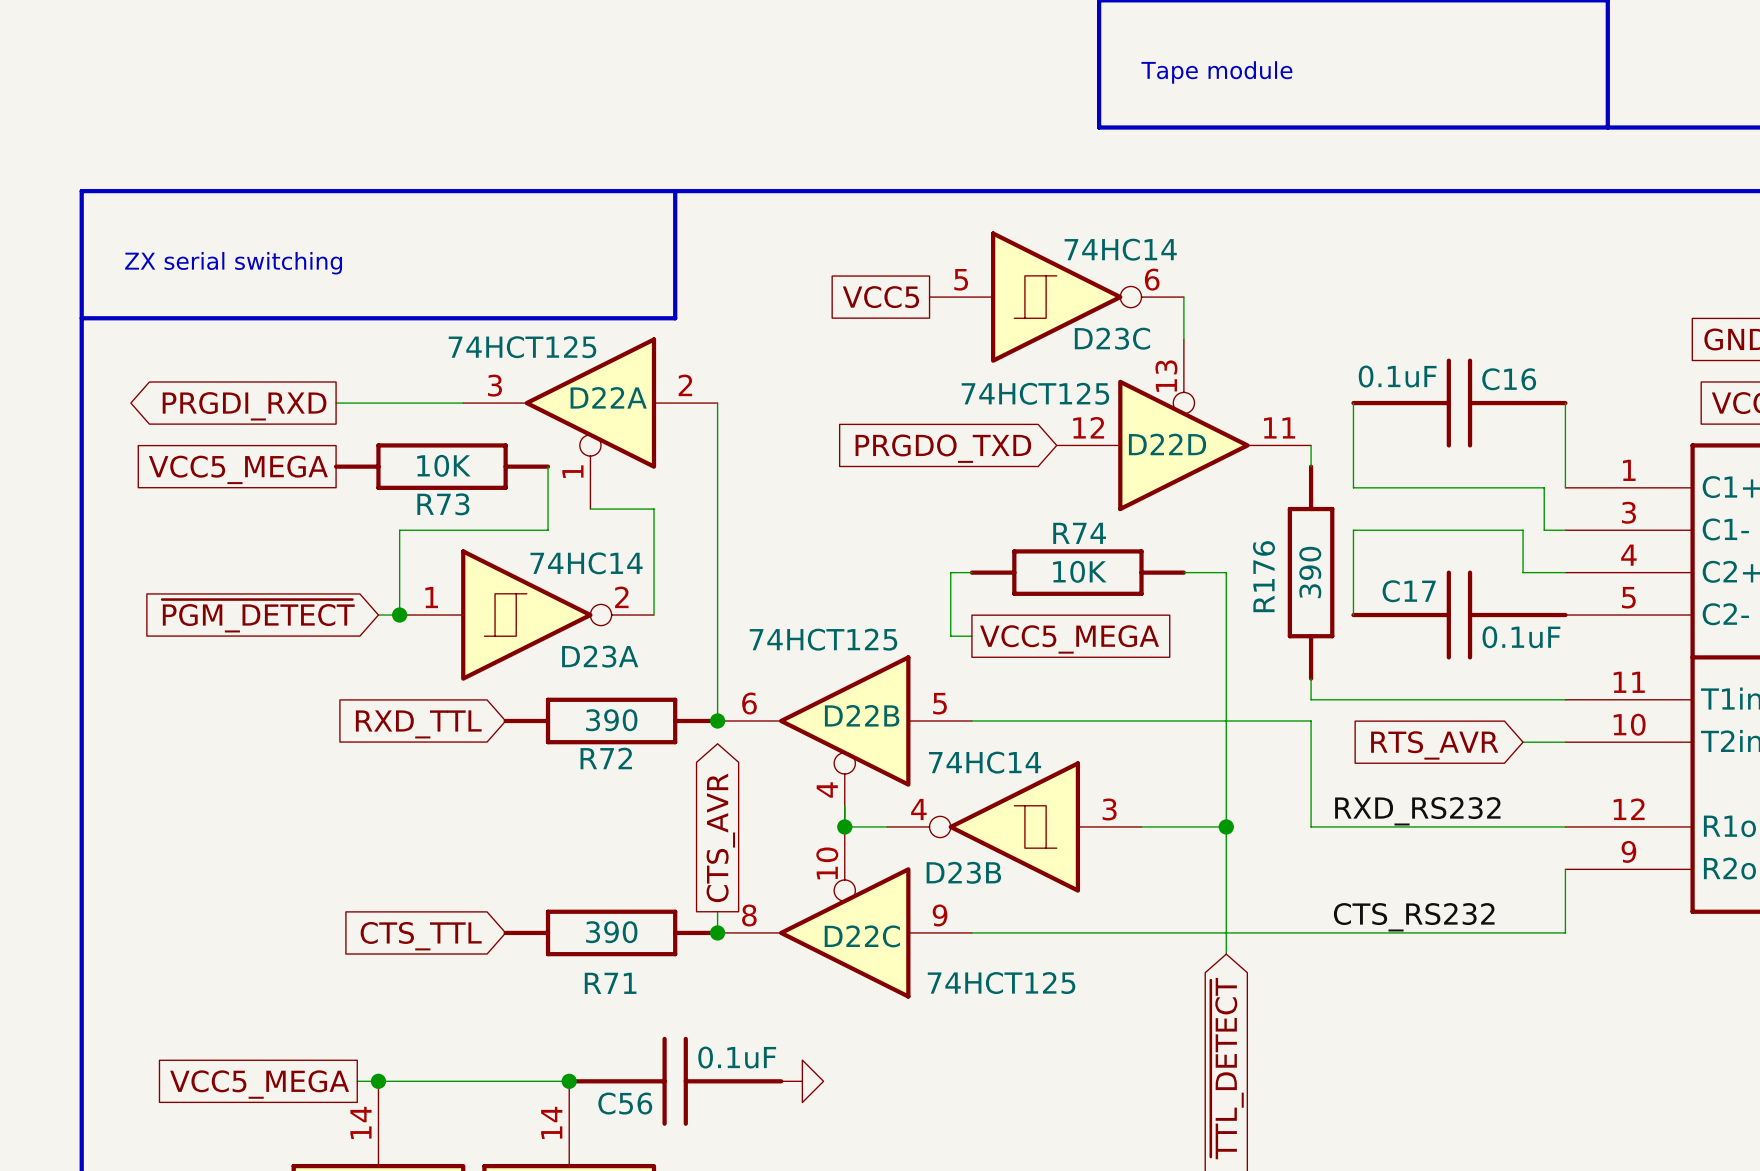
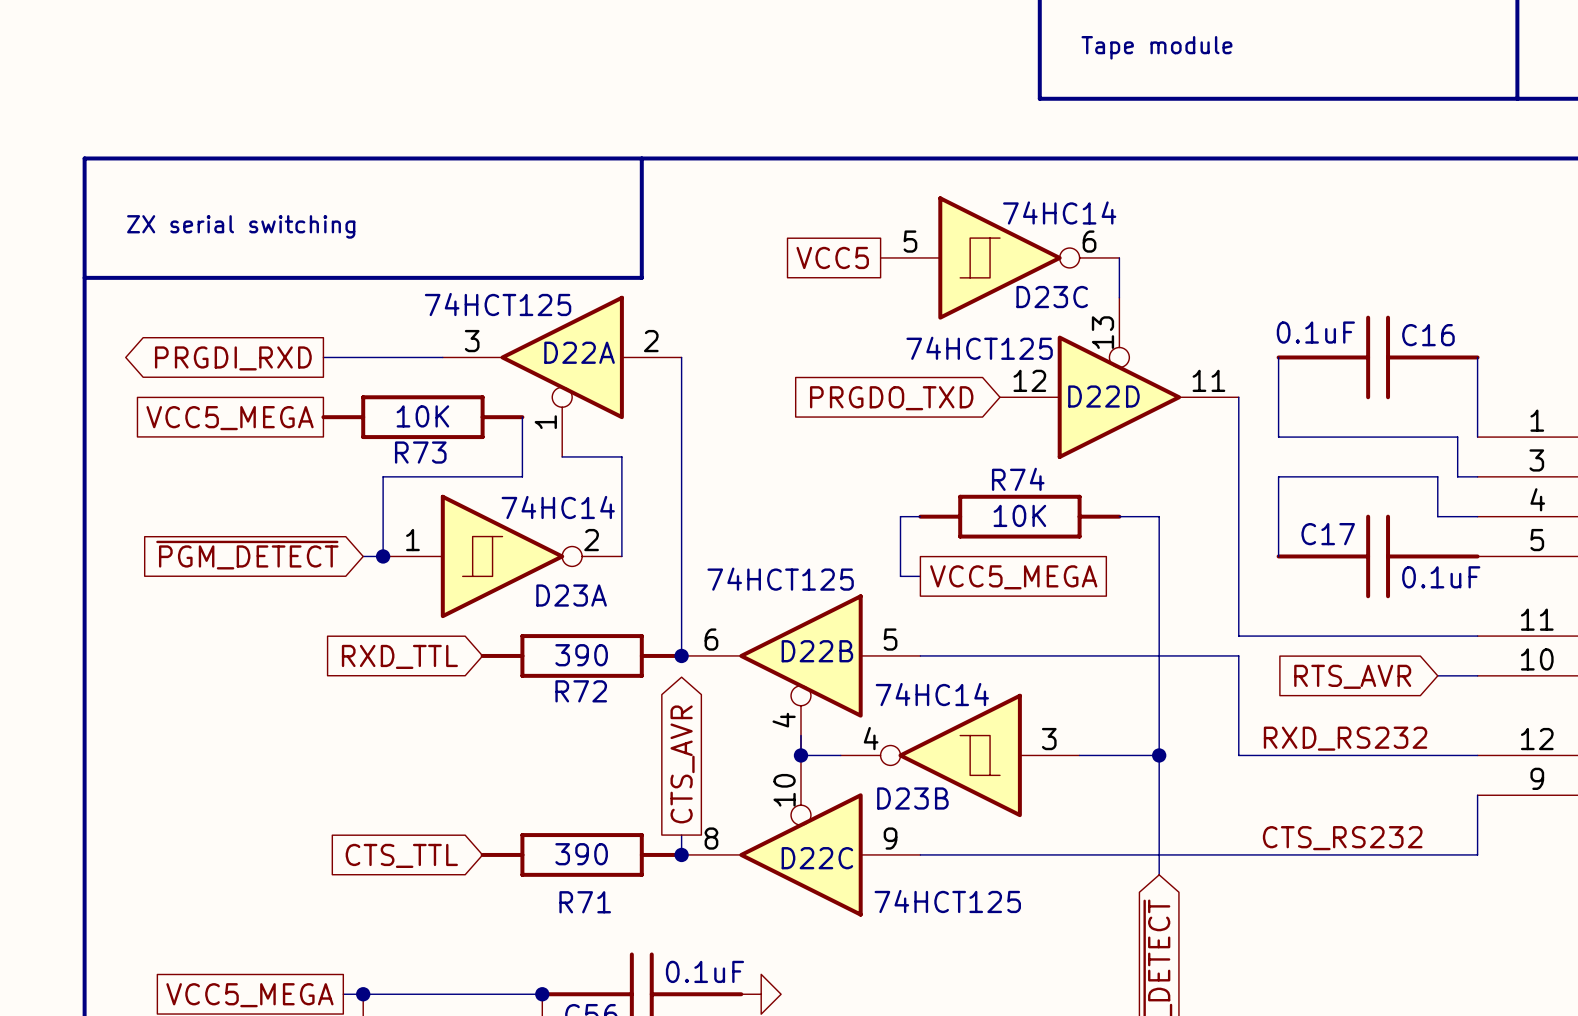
wire: none -> (1238, 417) (1238, 616)
R176: 390 (1311, 572) -> none

